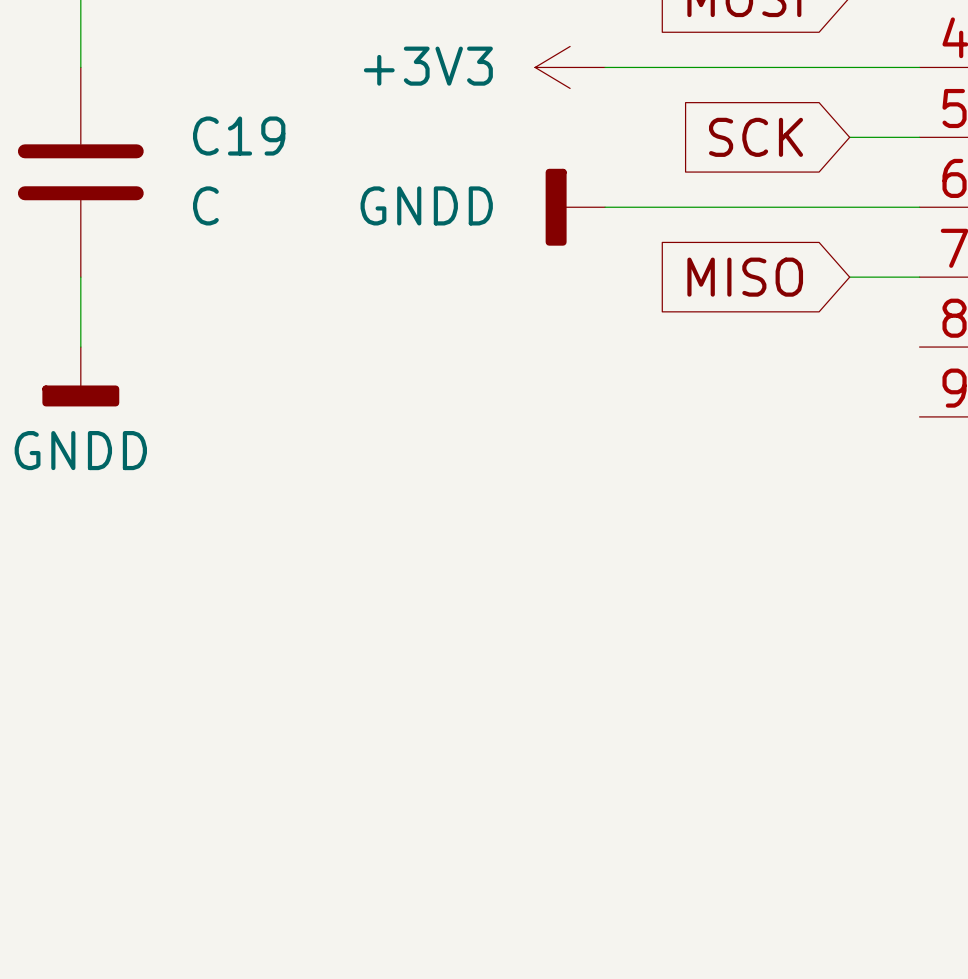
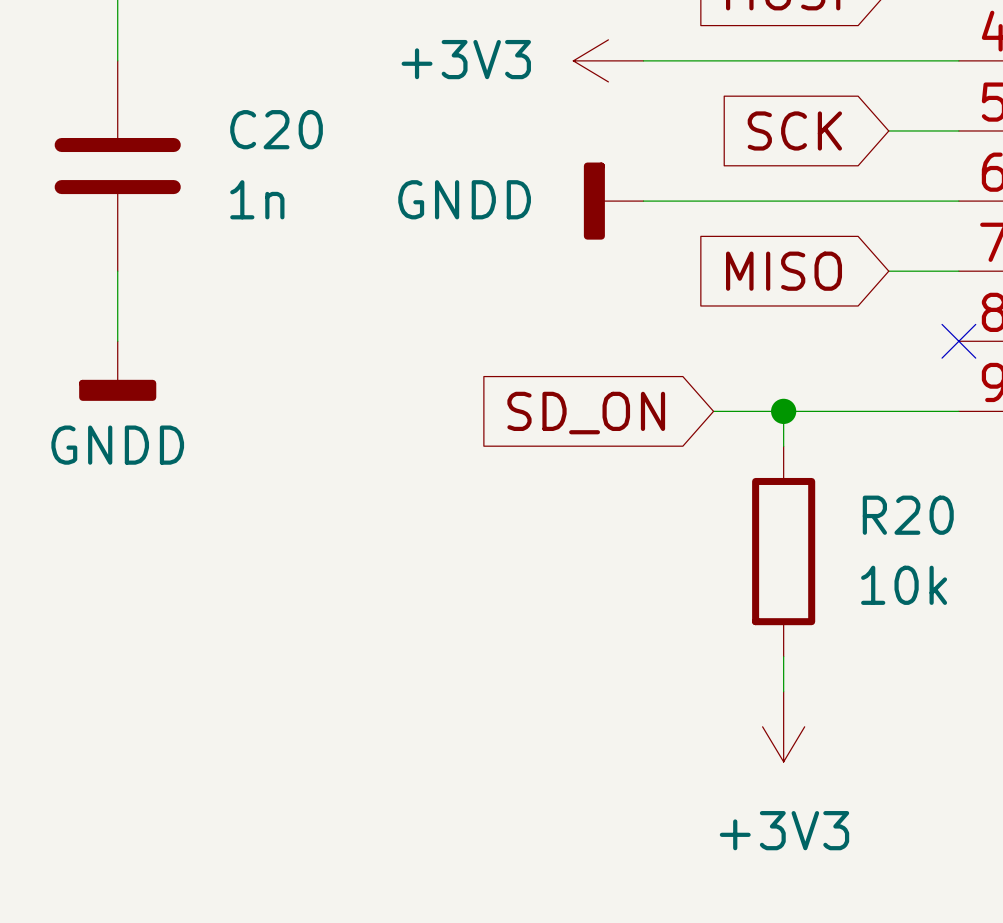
C19 name: C19 (239, 136) -> C20 (276, 129)
C19 value: C (205, 205) -> 1n (257, 199)
no-connect mark: none -> (958, 341)
wire: none -> (713, 411) (958, 411)
wire: none -> (783, 411) (783, 446)
junction: none -> (783, 411)
global label: none -> SD_ON (586, 413)
R20: none -> 10k (783, 551)
wire: none -> (783, 656) (783, 691)
power symbol: none -> +3V3 (783, 726)

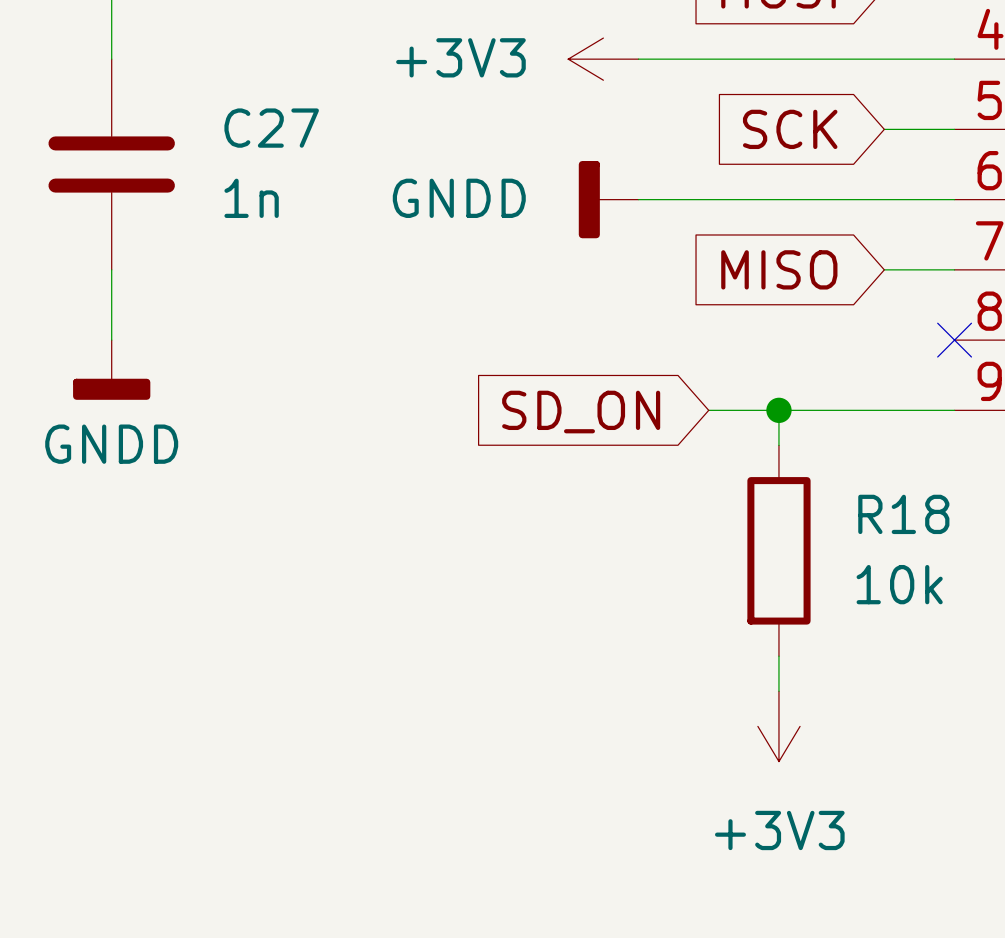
C20 name: C20 (276, 129) -> C27 (271, 128)
R20 name: R20 (908, 515) -> R18 (903, 514)

